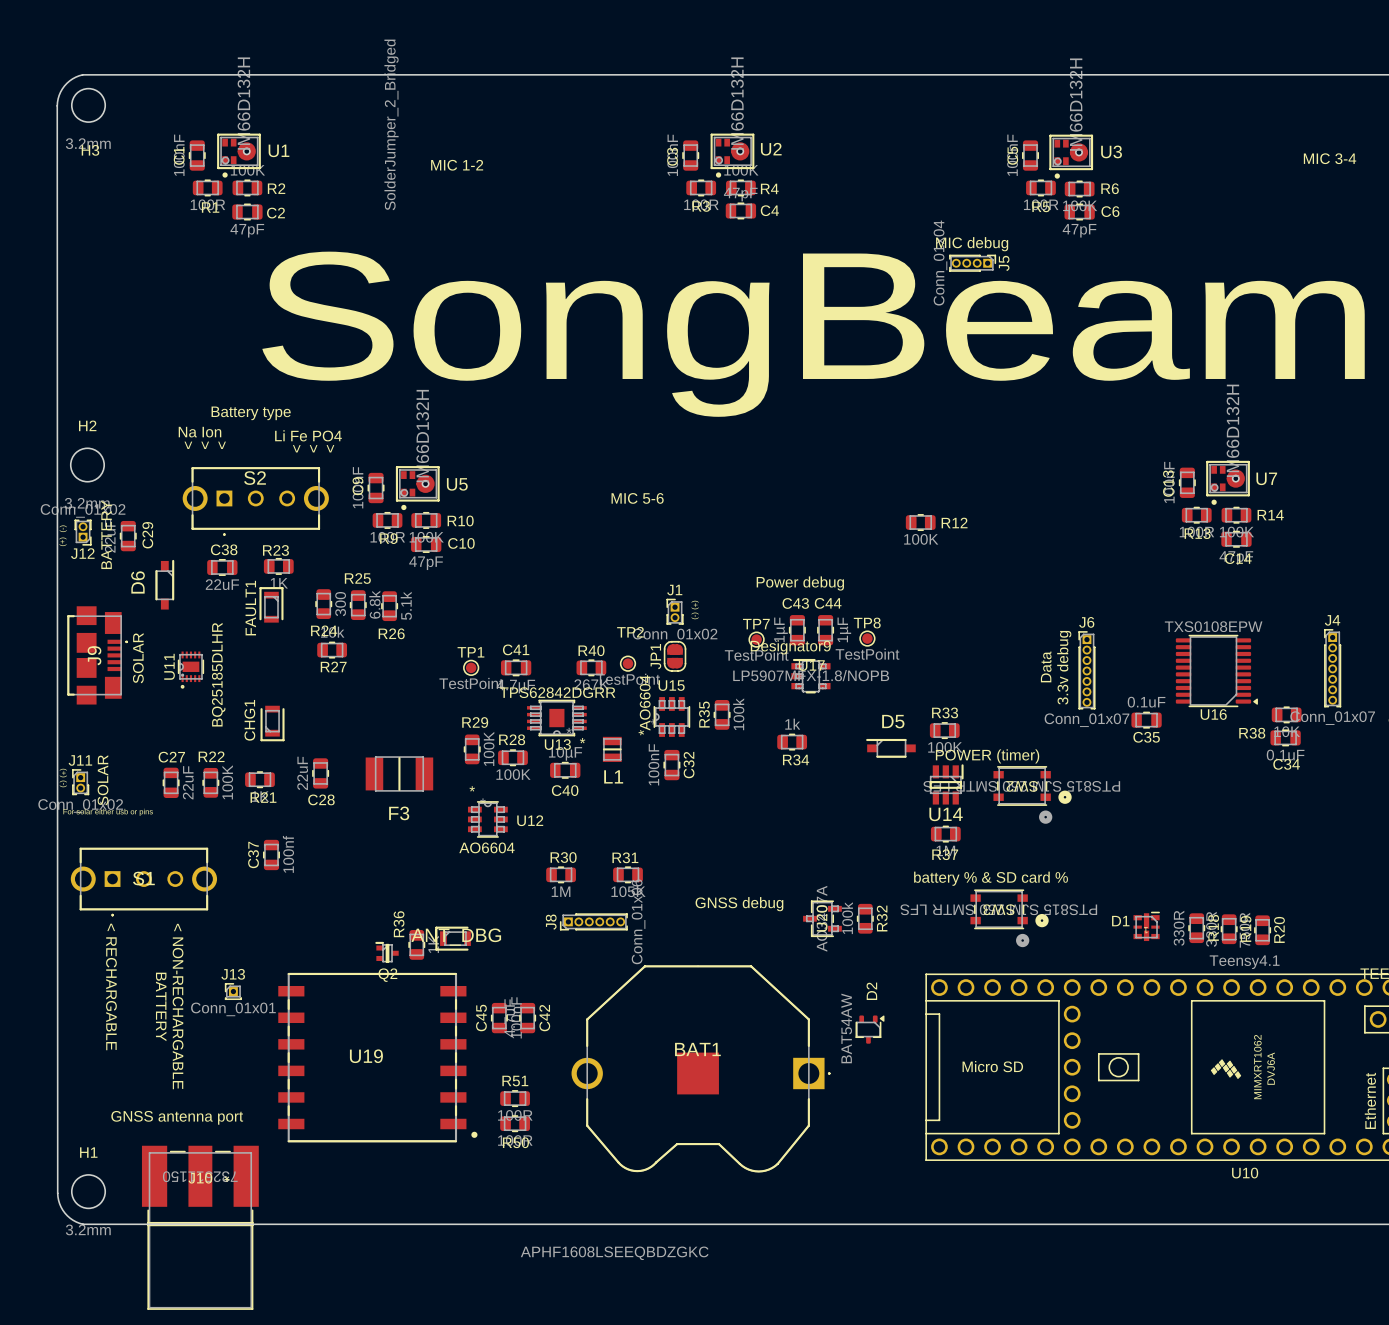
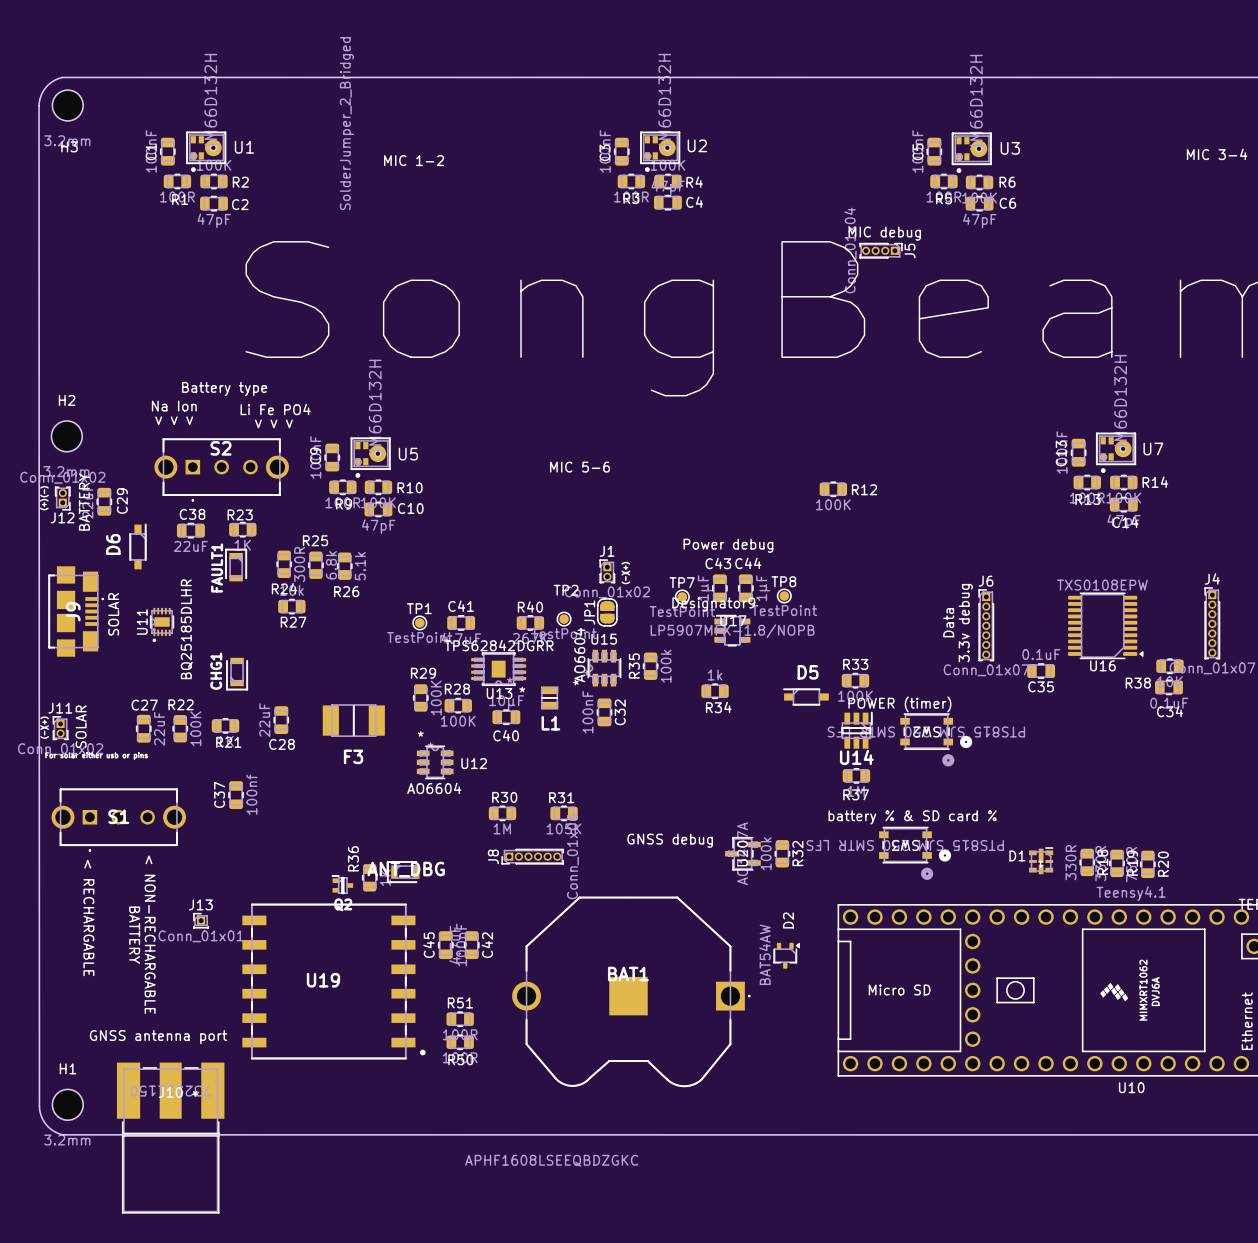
R24 value: 300 (340, 604) -> 300R (299, 564)

